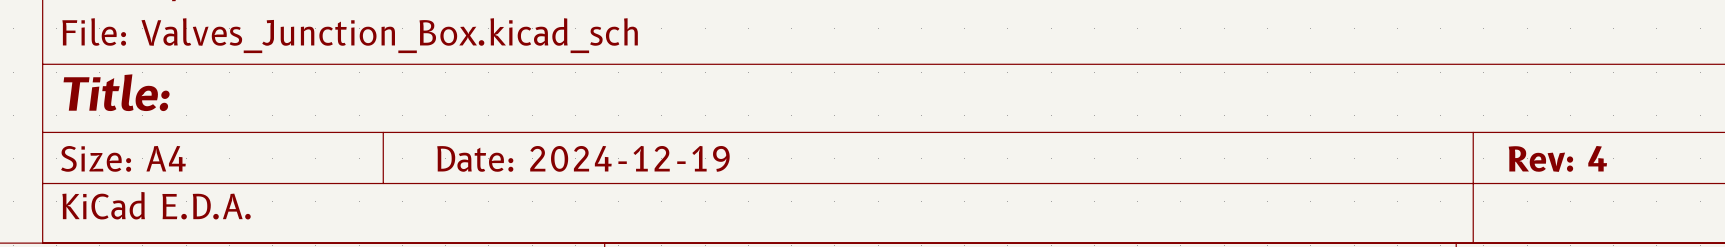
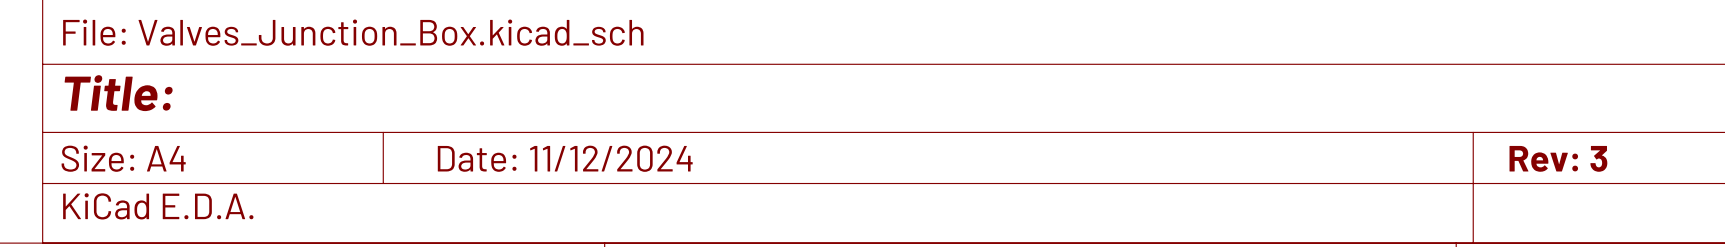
title block: Date: 2024-12-19 (583, 158) -> Date: 11/12/2024 (565, 158)
title block: Rev: 4 (1557, 158) -> Rev: 3 (1558, 158)

